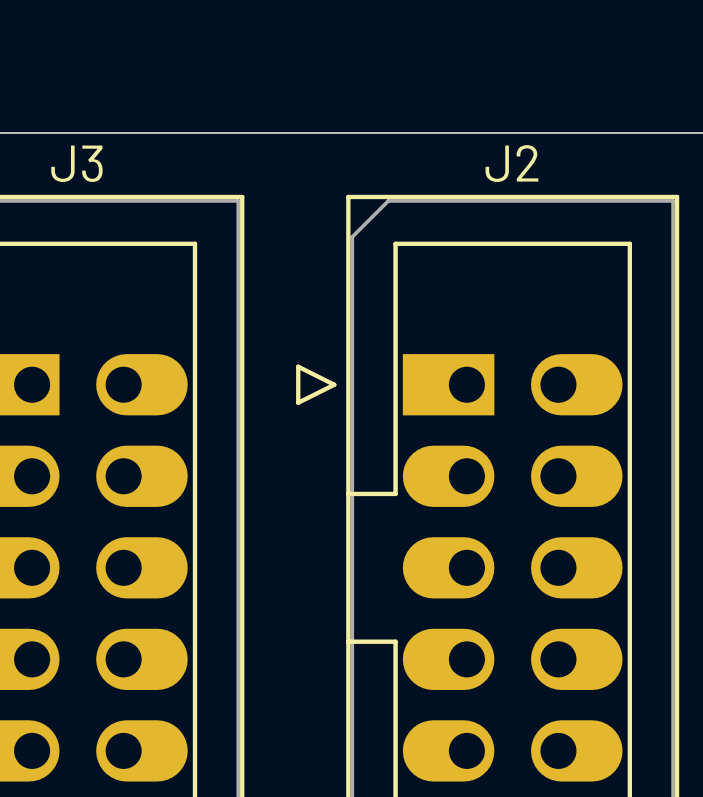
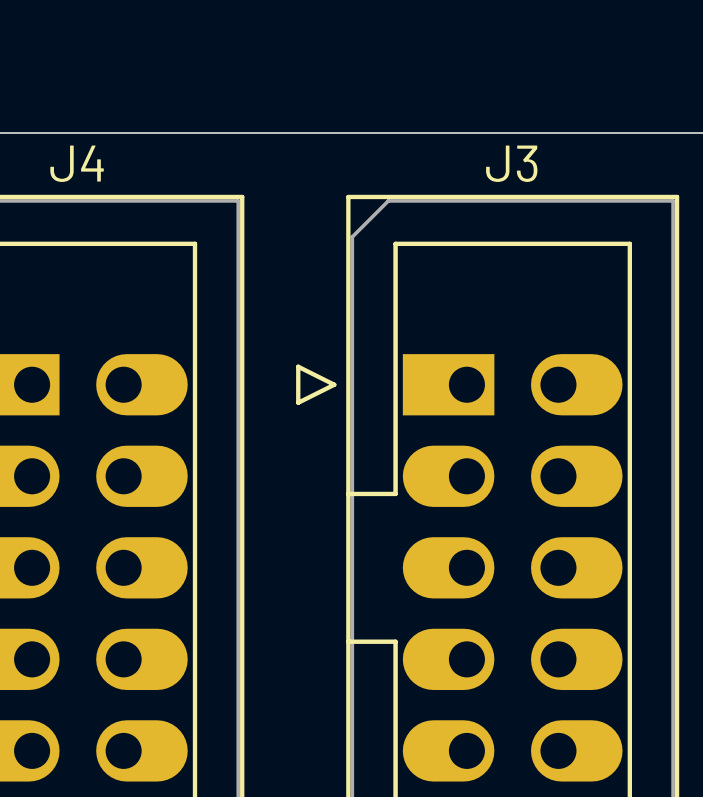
J3 name: J3 (76, 163) -> J4 (77, 163)
J2 name: J2 (511, 163) -> J3 (511, 163)

